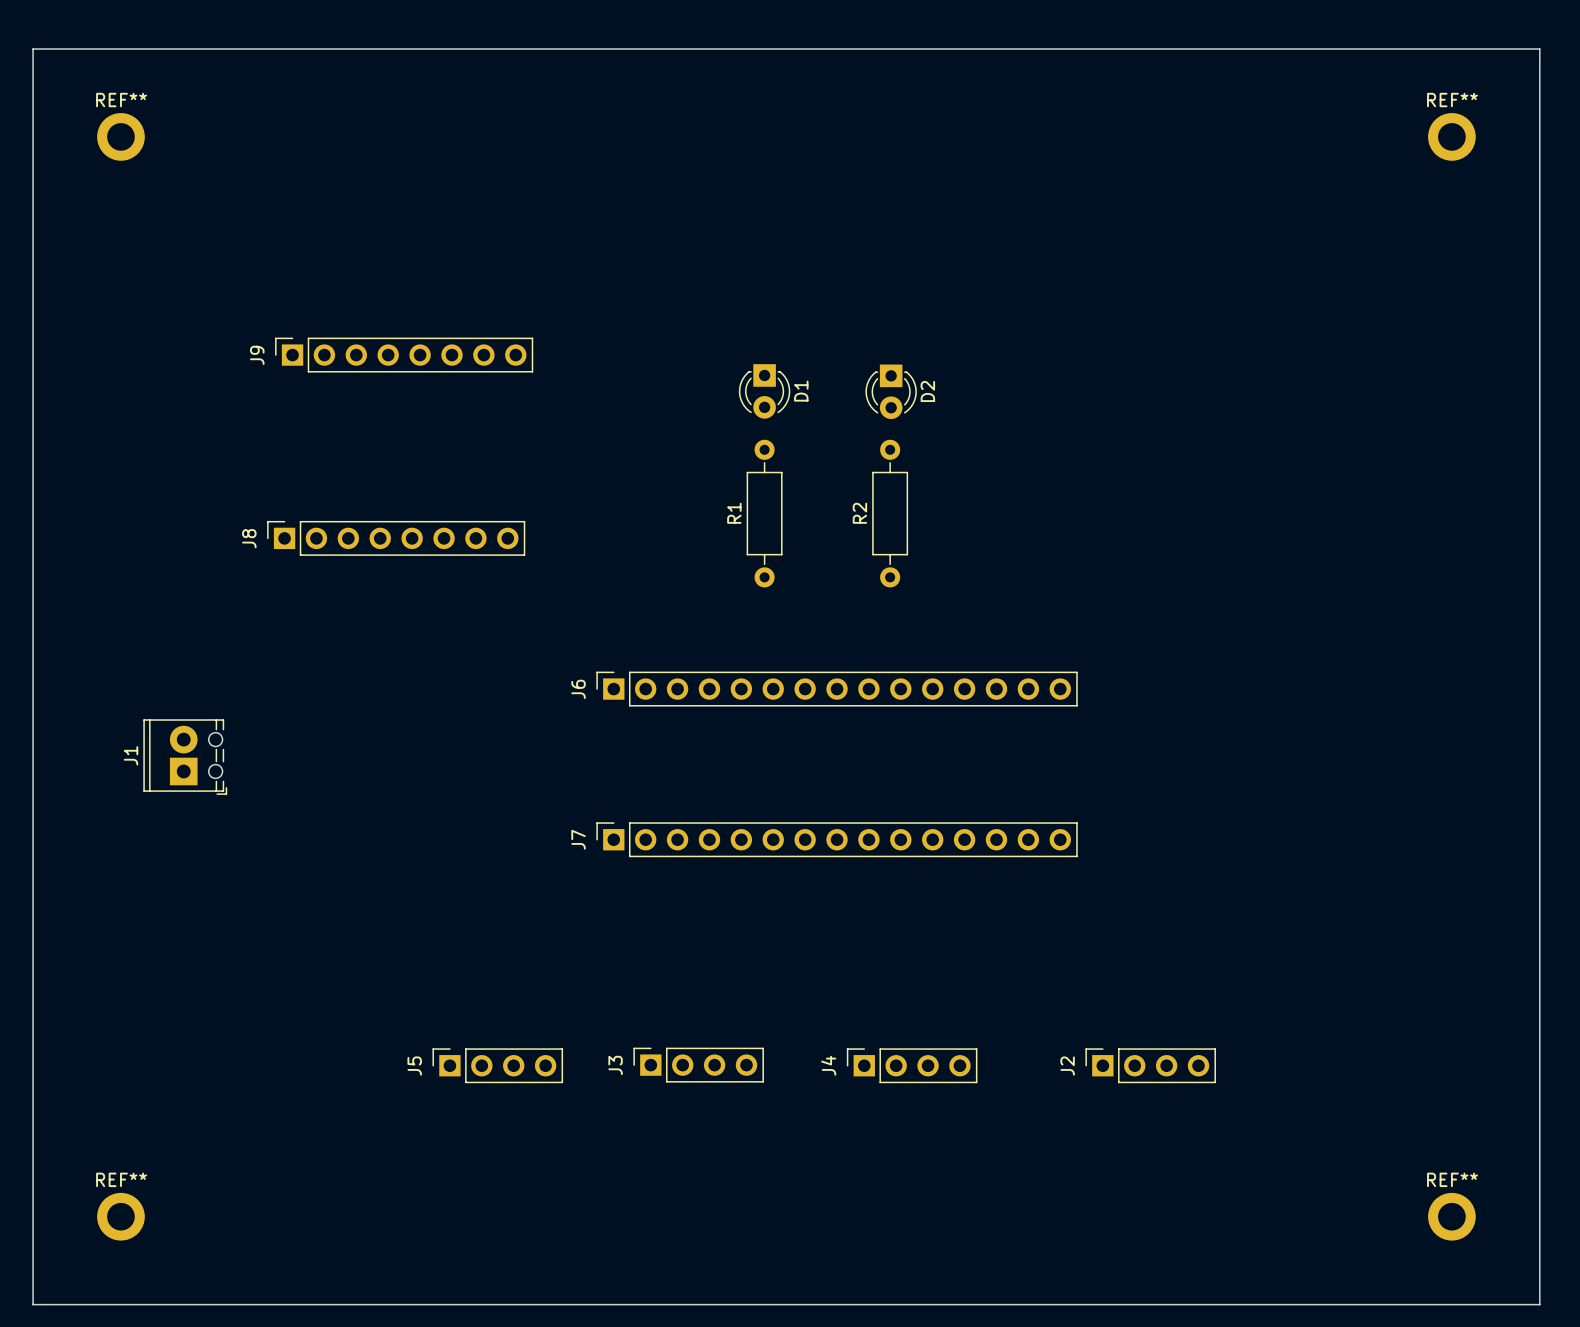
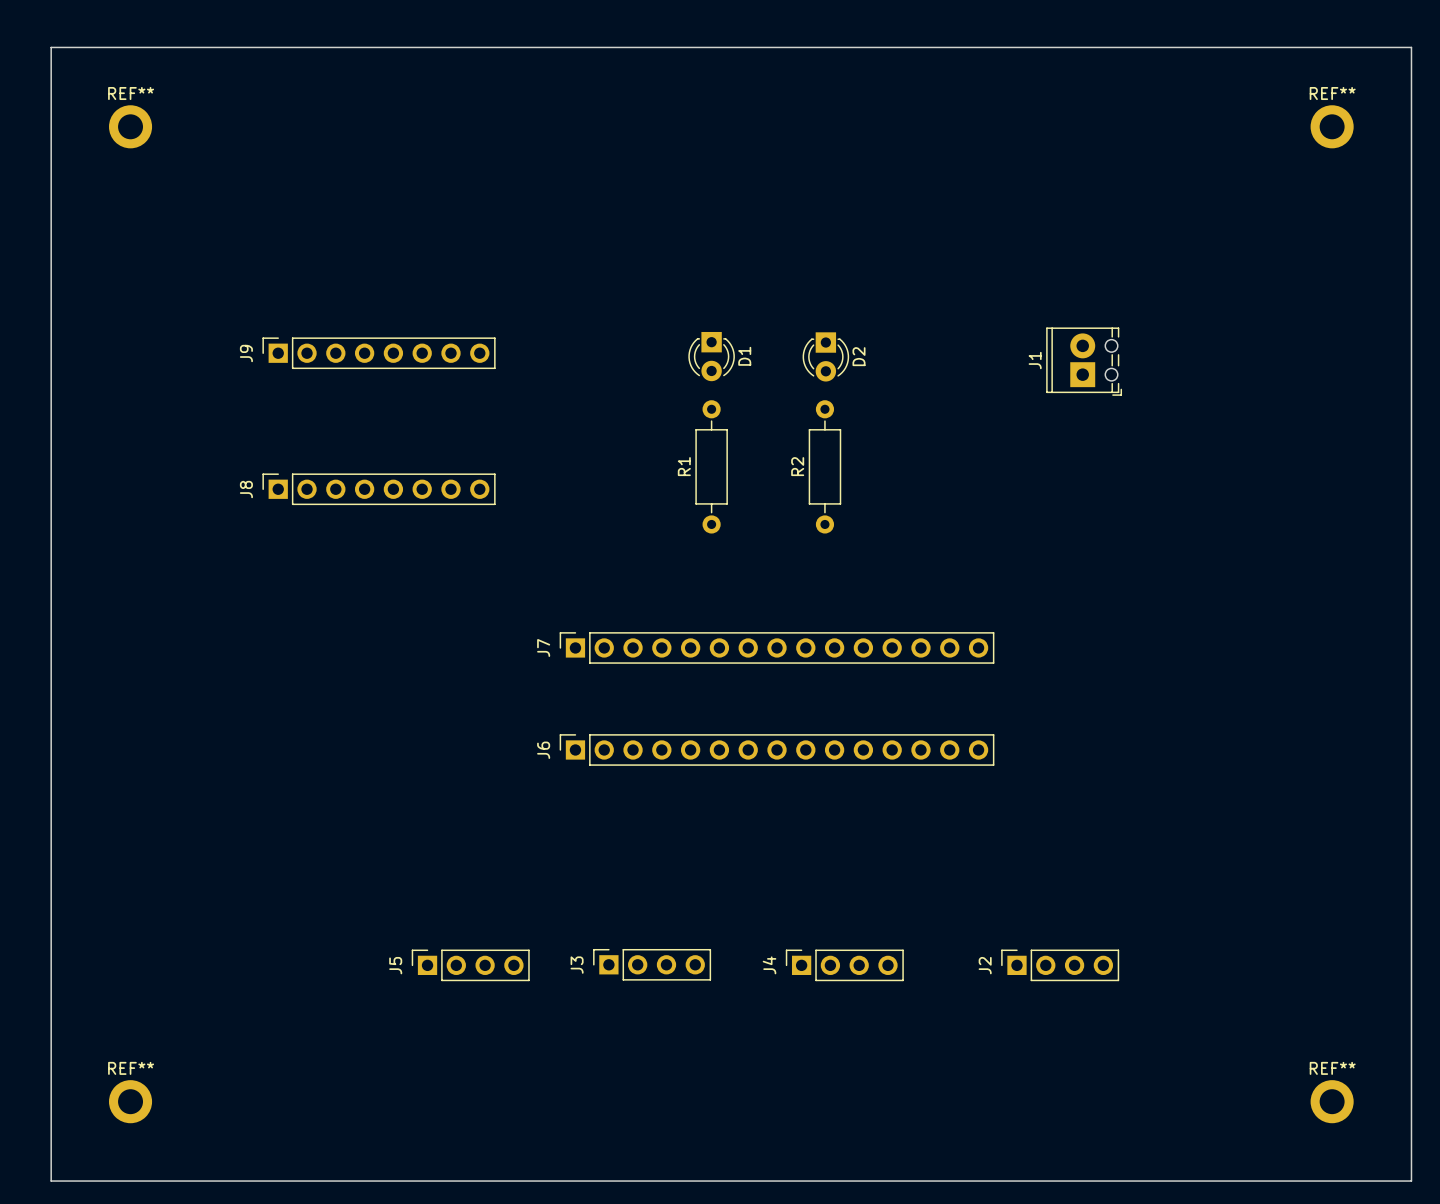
J9 position: (404, 355) -> (379, 353)
J6 position: (837, 689) -> (777, 749)
J1 position: (185, 757) -> (1084, 361)
J7 position: (837, 839) -> (777, 647)

